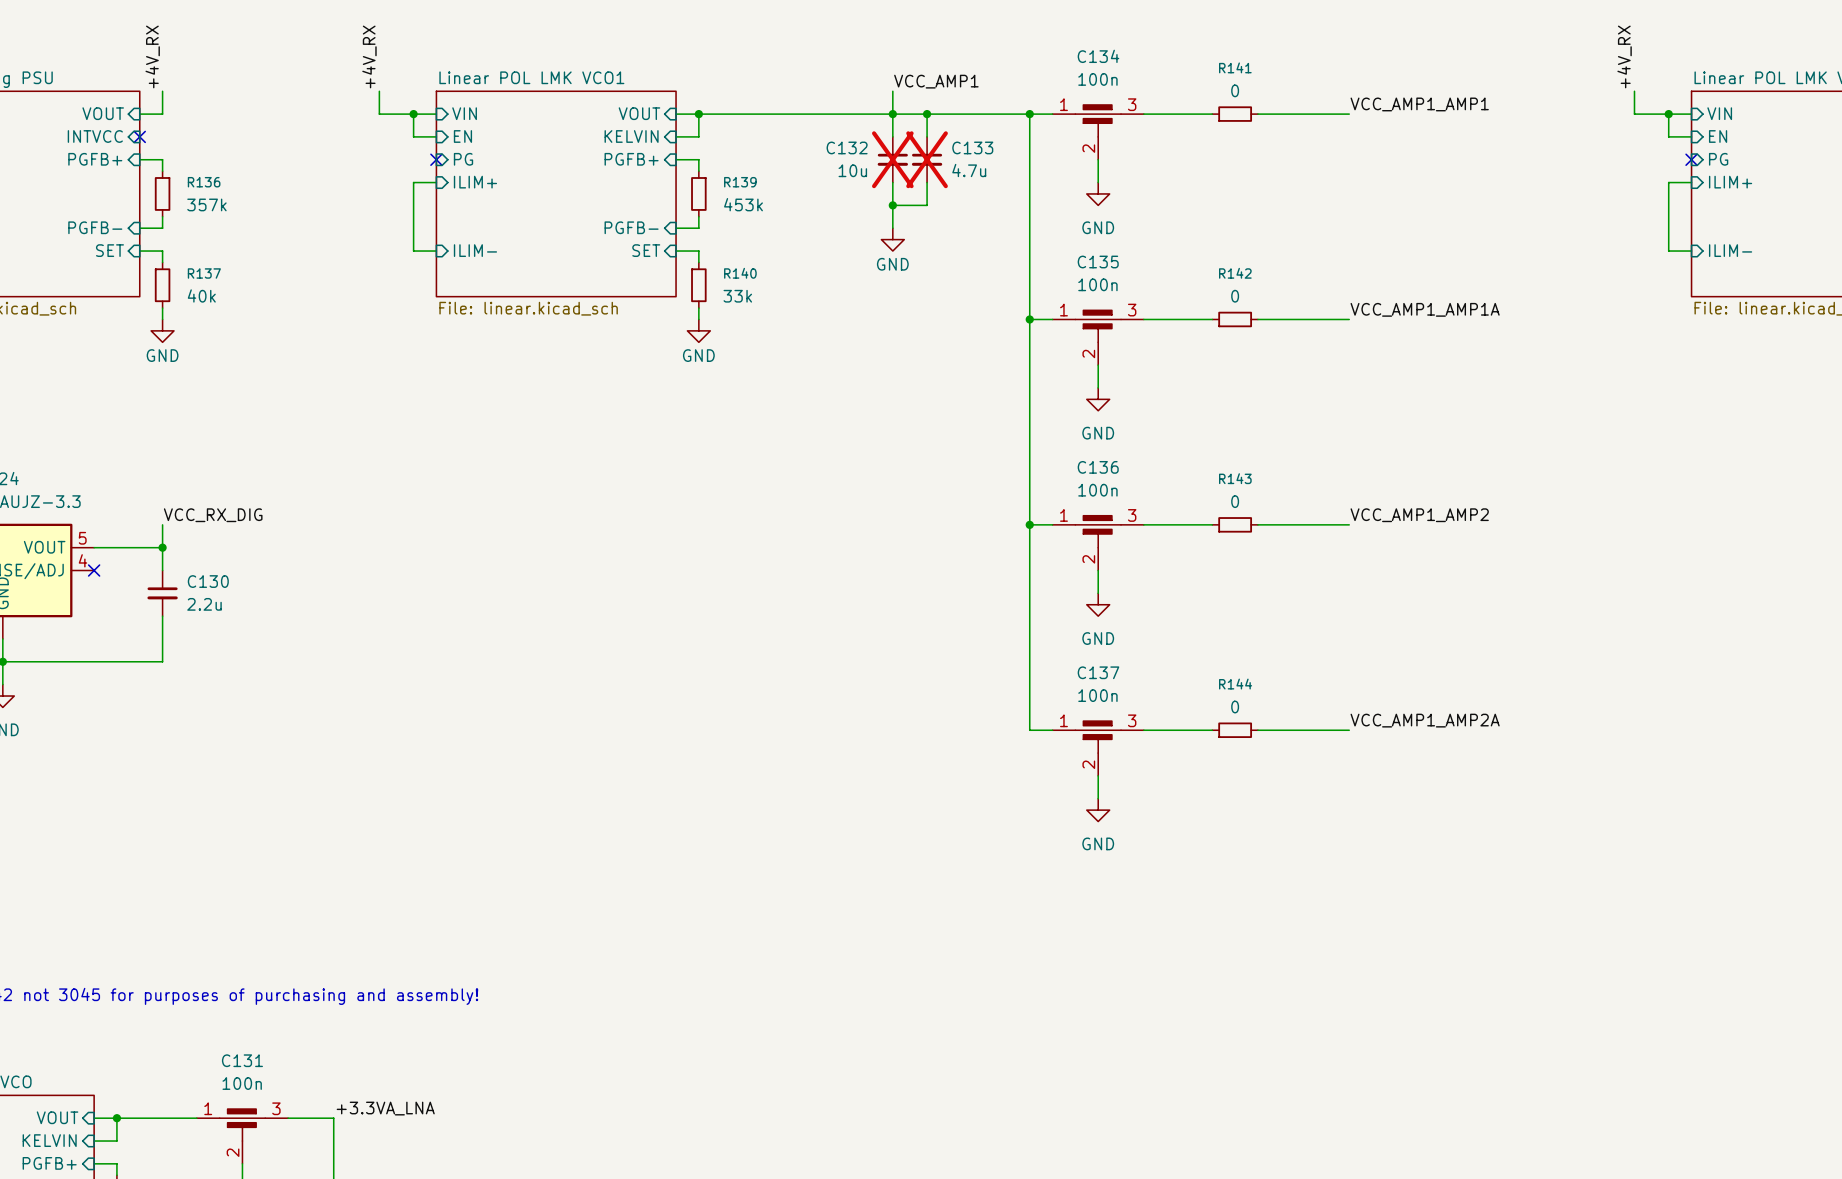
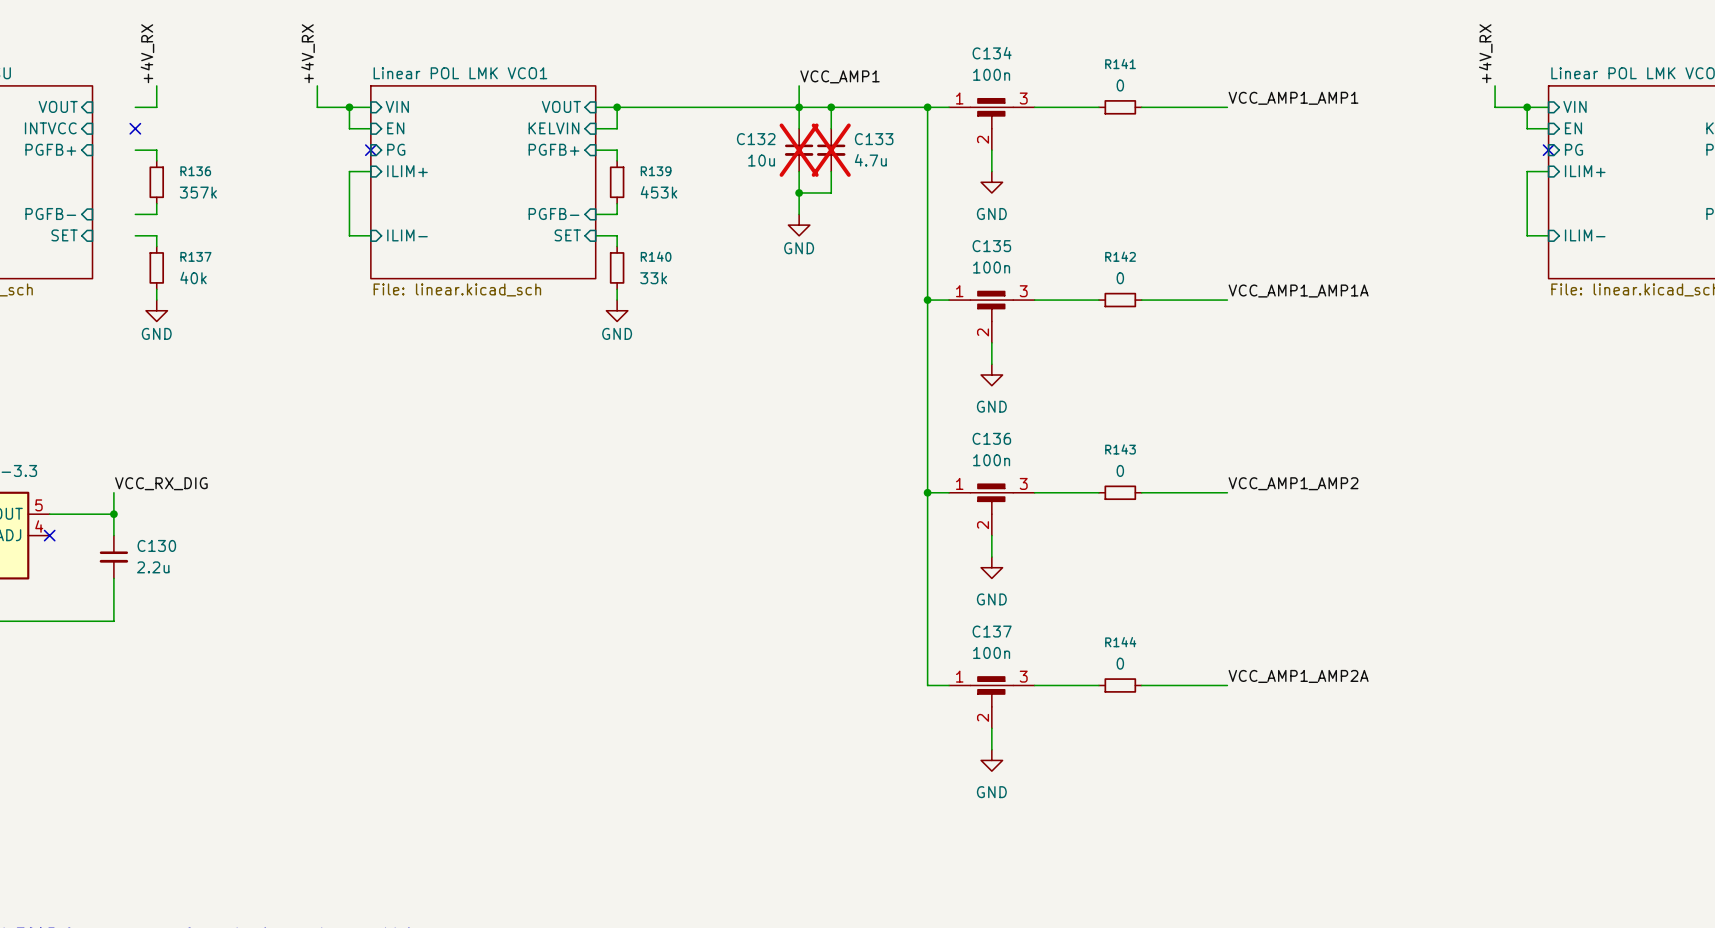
label position: +4V_RX (152, 56) -> +4V_RX (147, 53)
wire: (162, 91) (162, 114) (139, 114) -> (156, 85) (156, 107) (135, 107)
no-connect mark position: (139, 136) -> (135, 128)
wire: (139, 159) (162, 159) (162, 171) -> (135, 150) (156, 150) (156, 160)
R136 position: (162, 193) -> (156, 182)
wire: (162, 216) (162, 228) (139, 228) -> (156, 203) (156, 214) (135, 214)
wire: (139, 251) (162, 251) (162, 262) -> (135, 235) (156, 235) (156, 246)
R137 position: (162, 285) -> (156, 267)
wire: (162, 308) (162, 319) -> (156, 289) (156, 300)
power symbol position: GND (162, 330) -> GND (156, 310)

